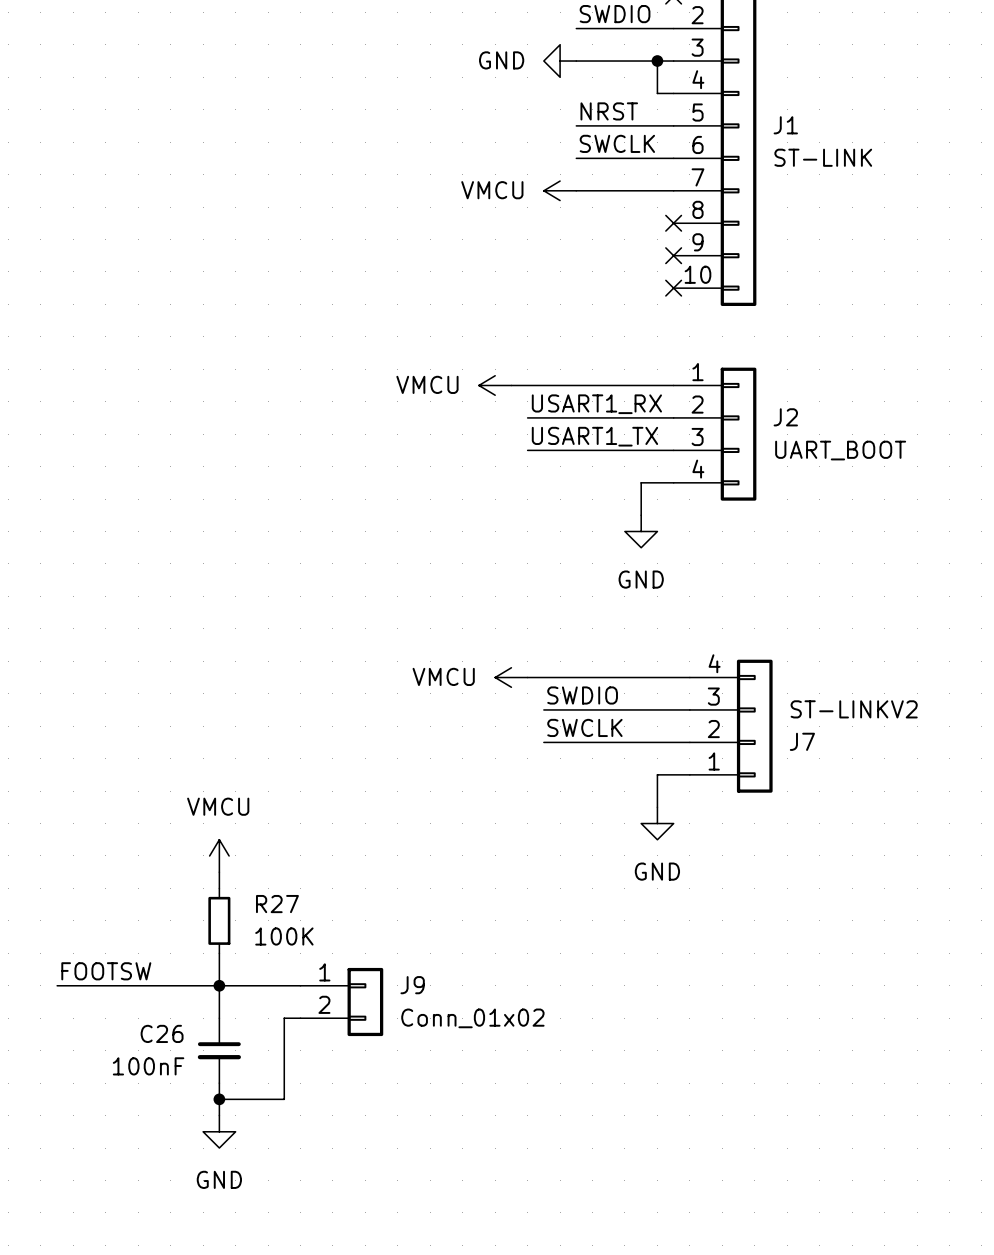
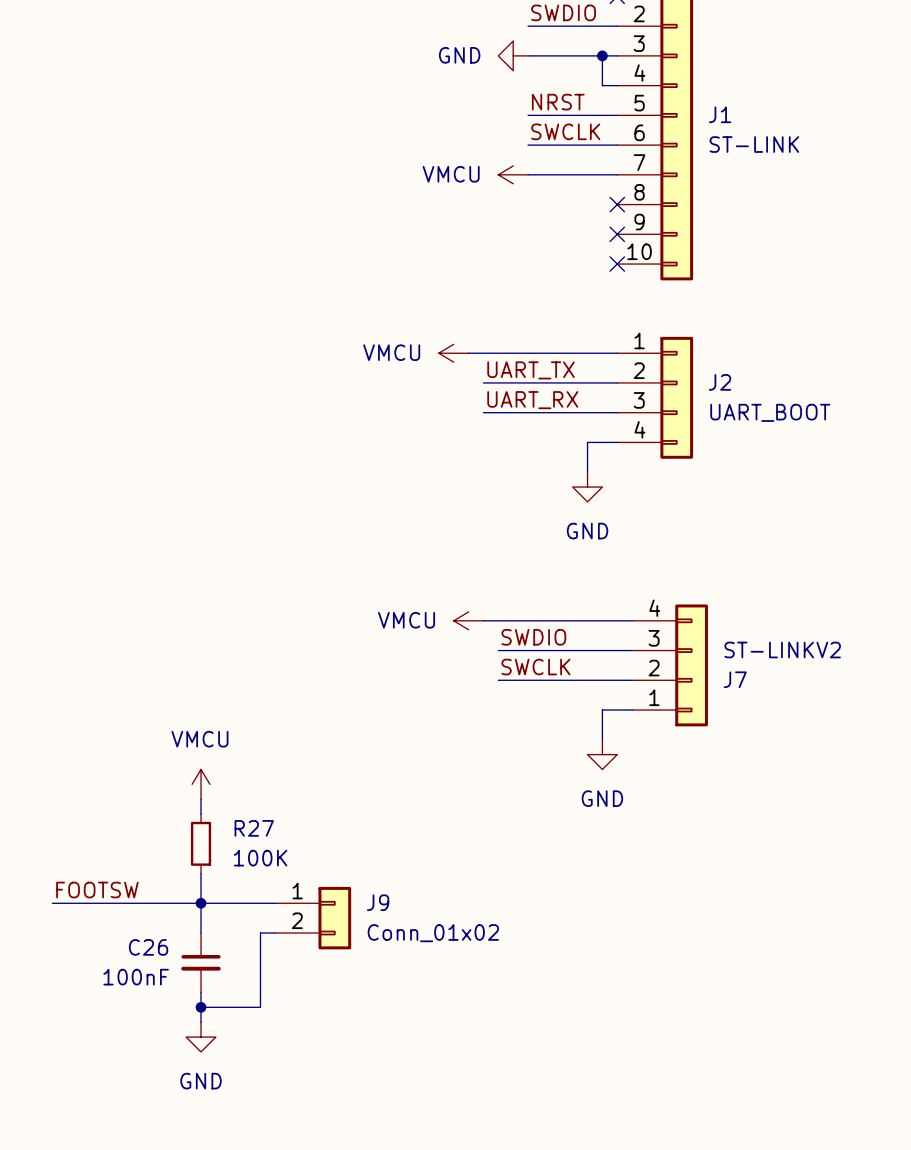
label: USART1_RX (596, 404) -> UART_TX (531, 370)
label: USART1_TX (594, 436) -> UART_RX (532, 400)

